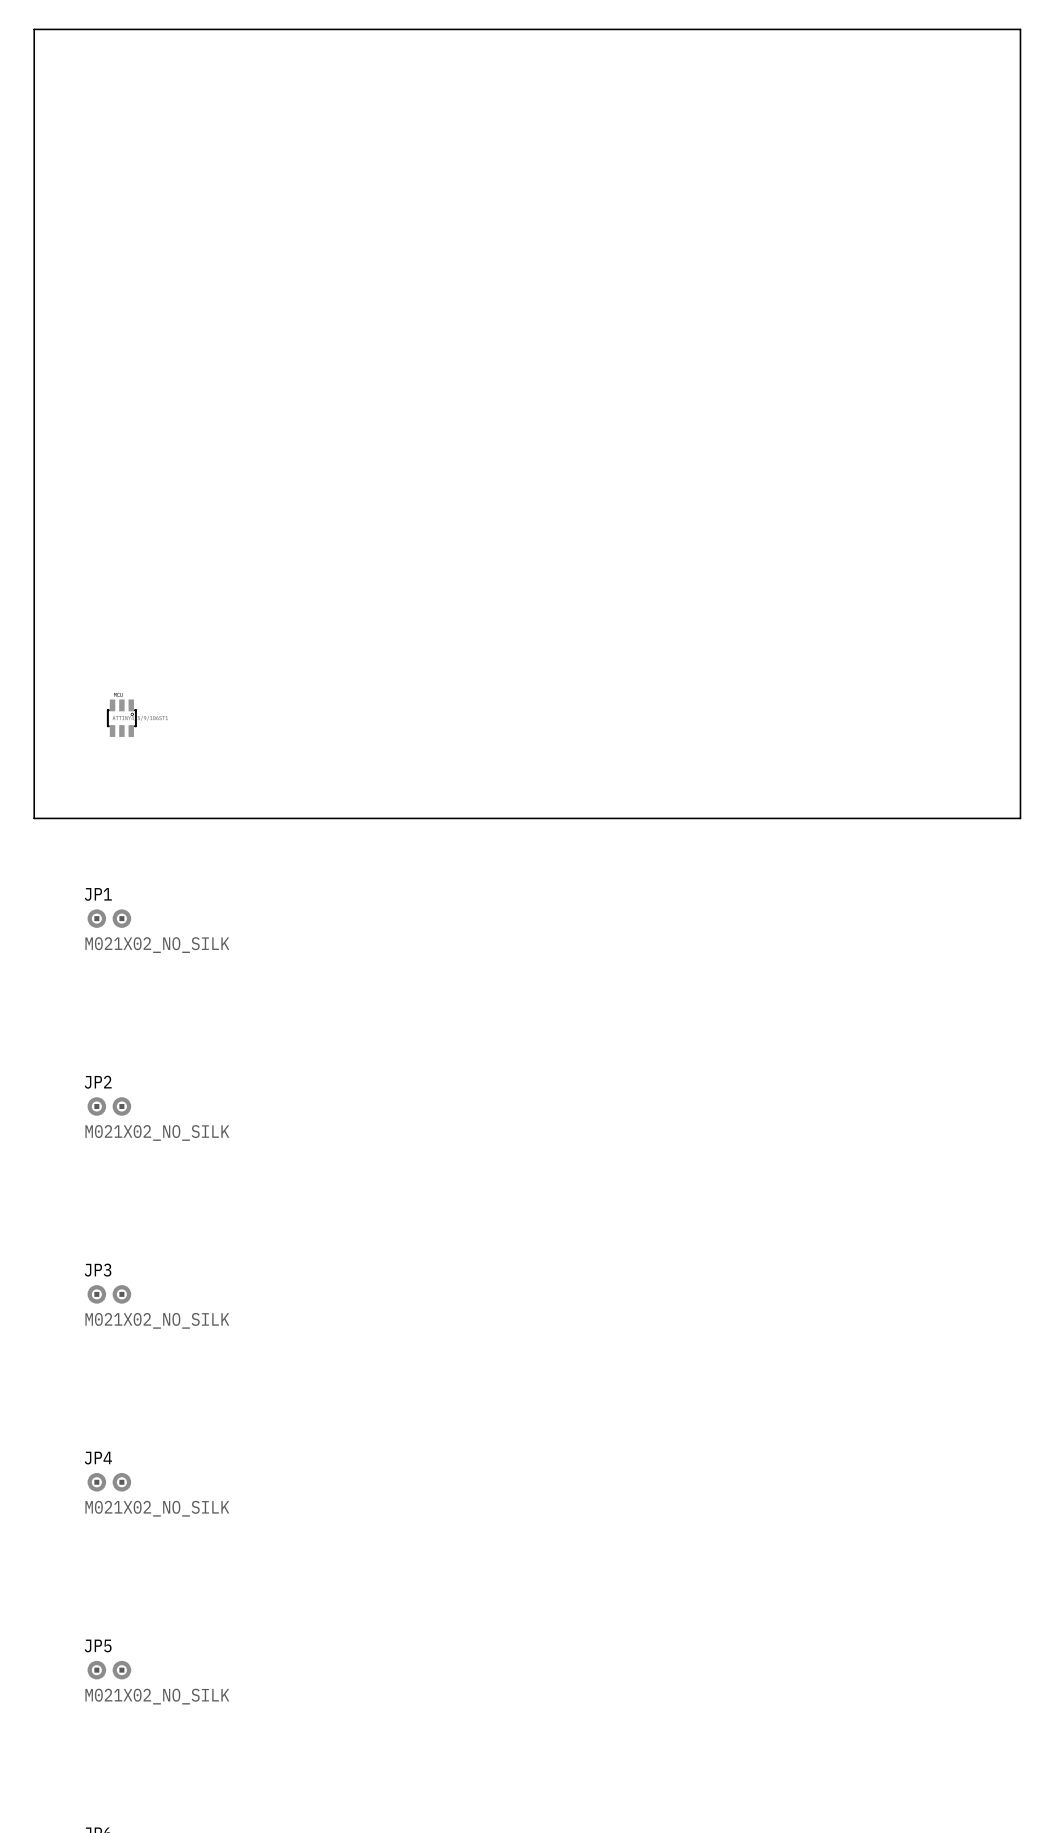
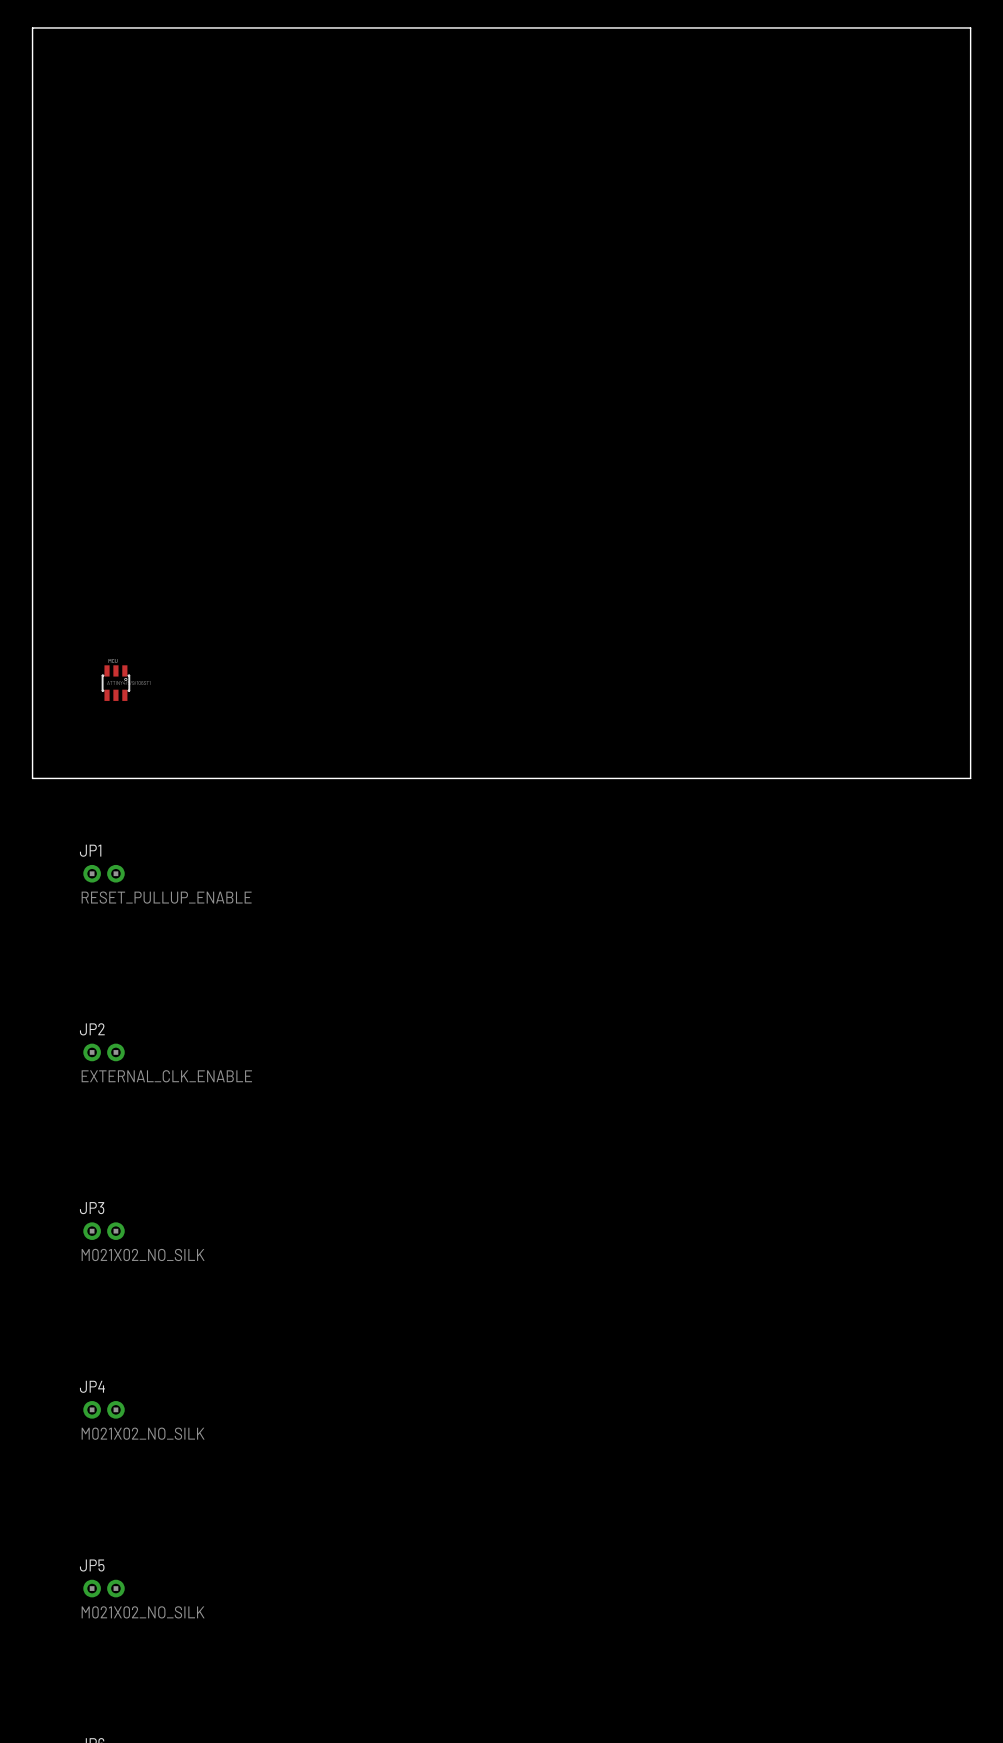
JP1 value: M021X02_NO_SILK (157, 945) -> RESET_PULLUP_ENABLE (166, 897)
JP2 value: M021X02_NO_SILK (157, 1132) -> EXTERNAL_CLK_ENABLE (166, 1076)

